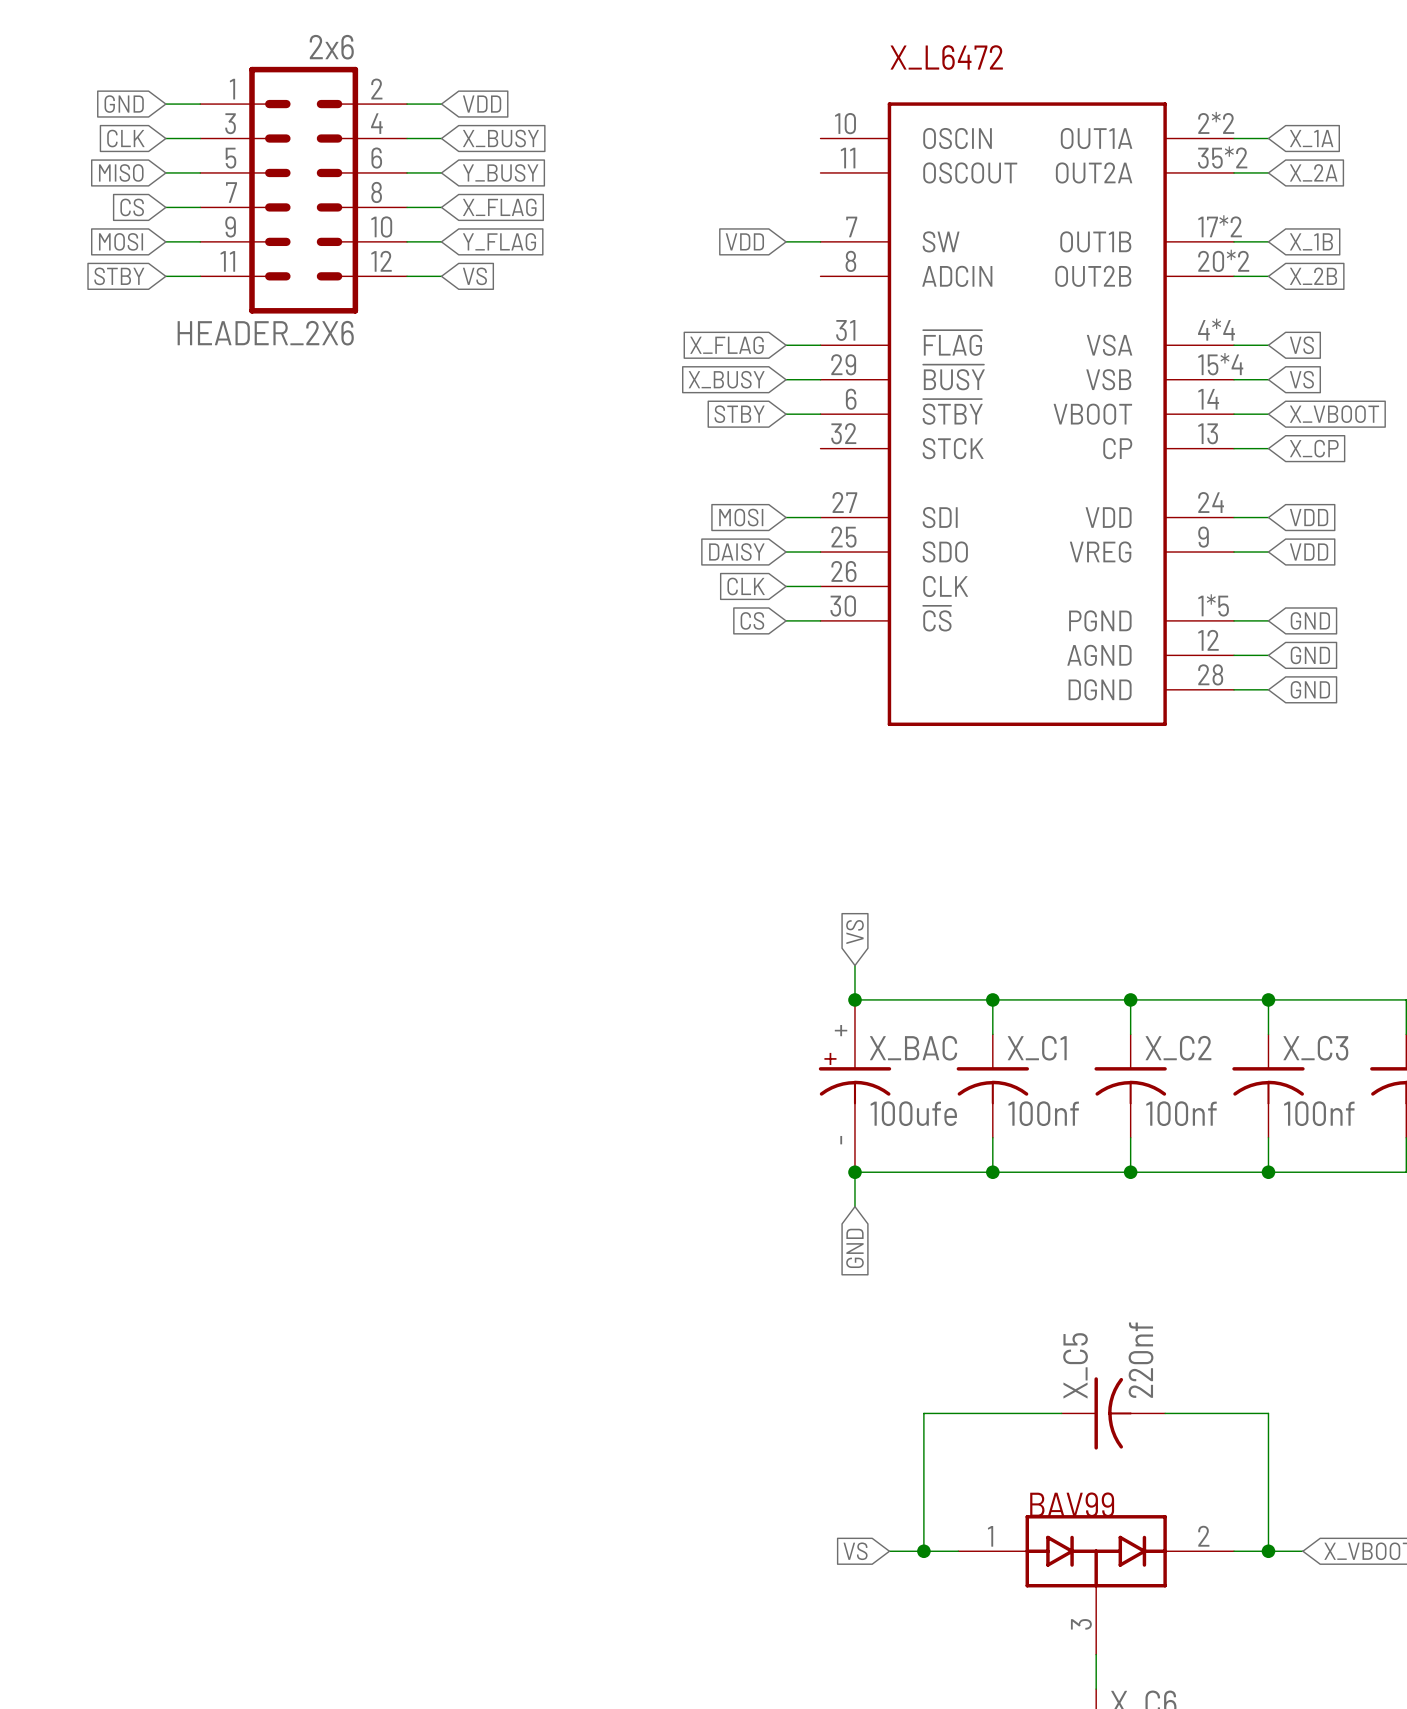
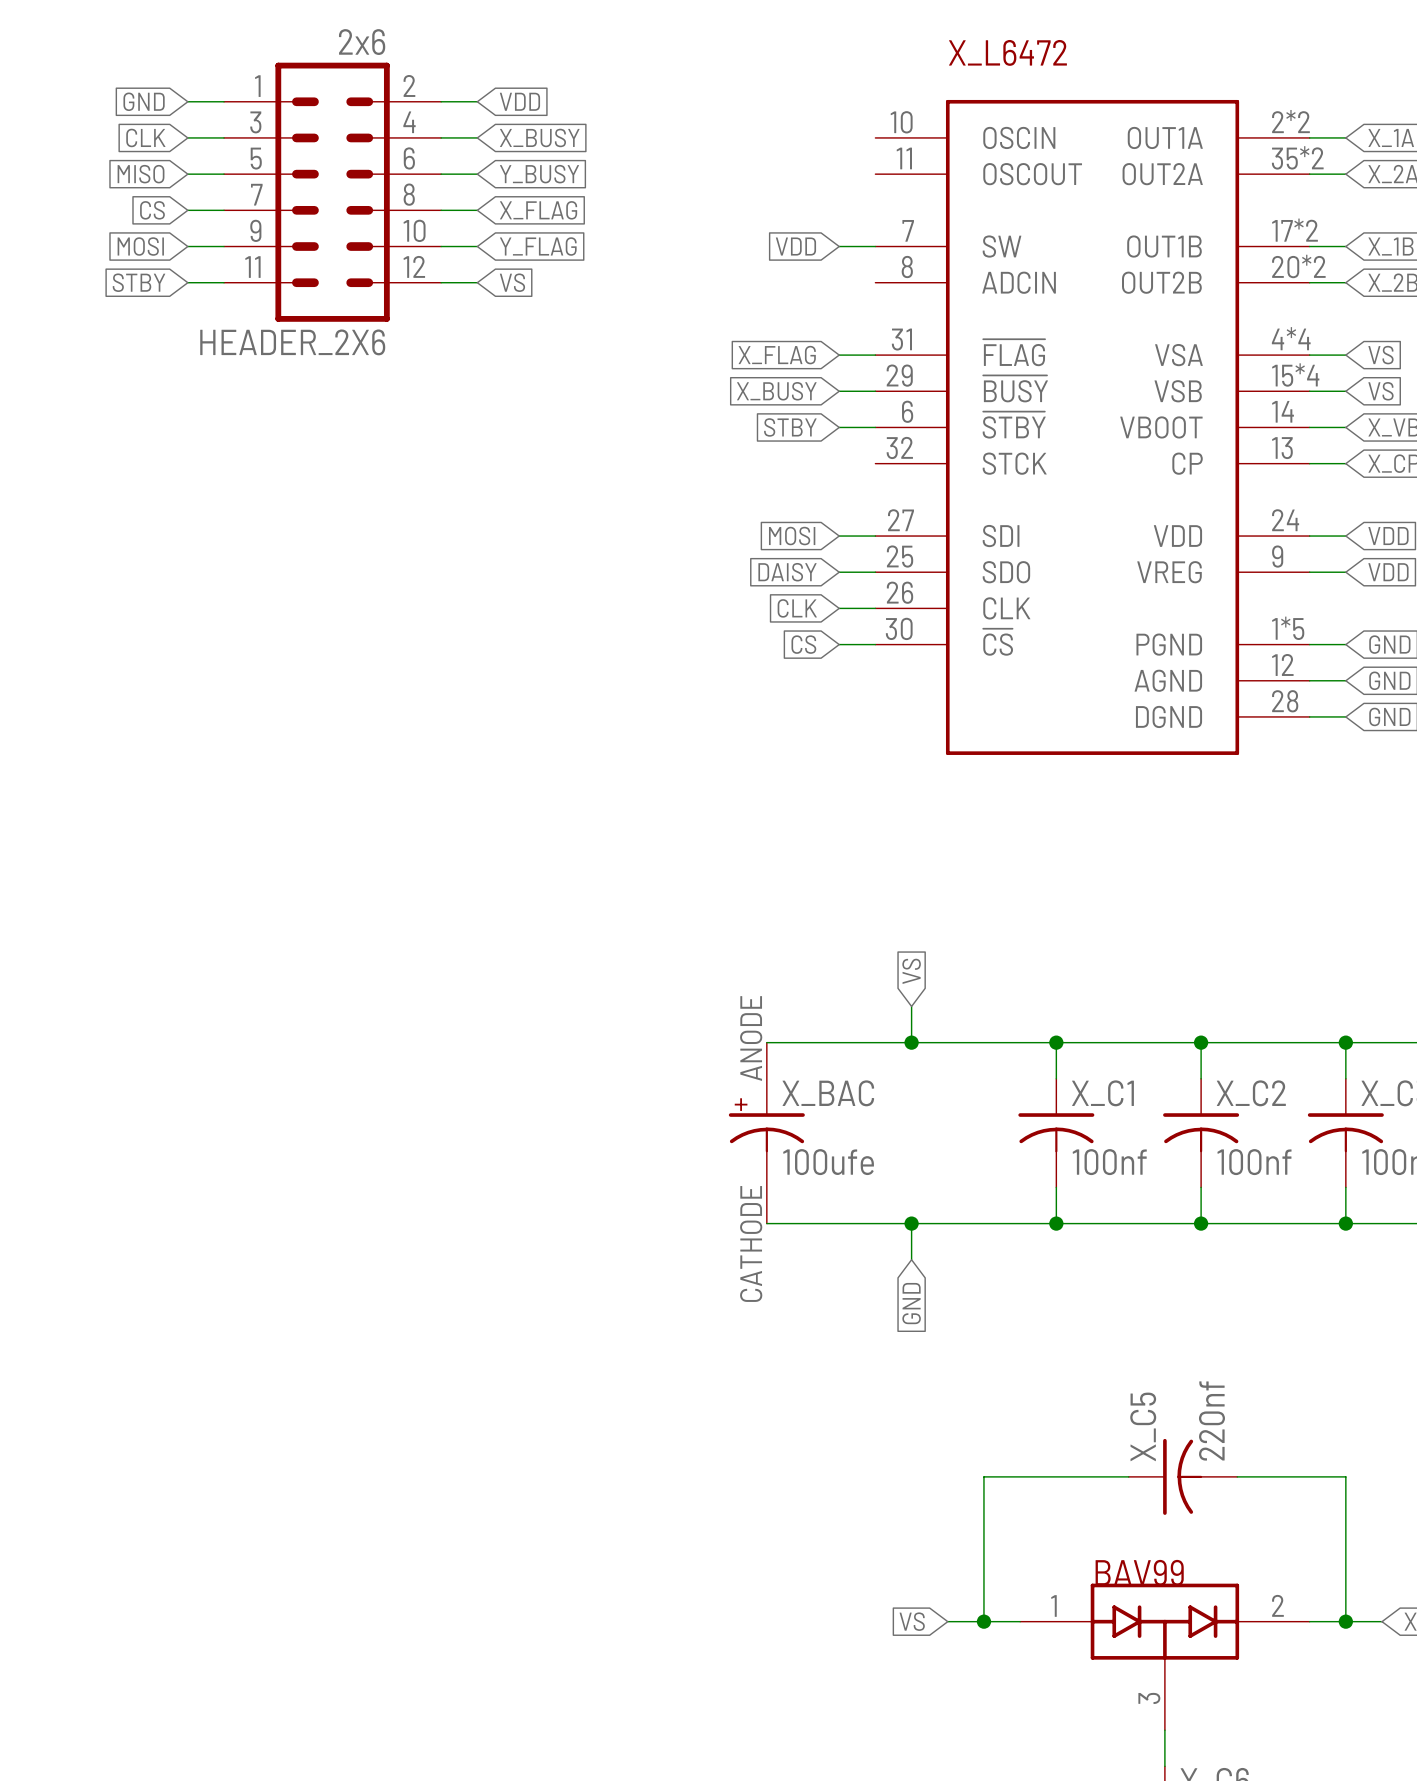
wire: none -> (766, 1042) (911, 1042)
X_BAC: none -> 100ufe (766, 1133)
X_BAC: 100ufe (854, 1086) -> none
wire: none -> (766, 1223) (911, 1223)

